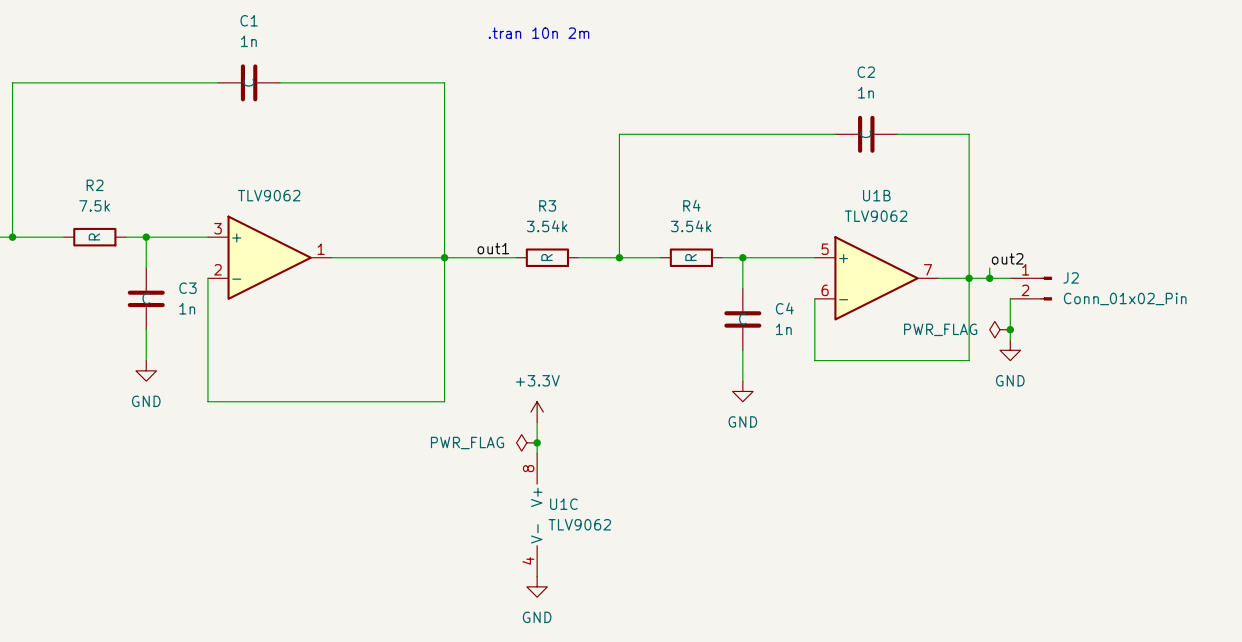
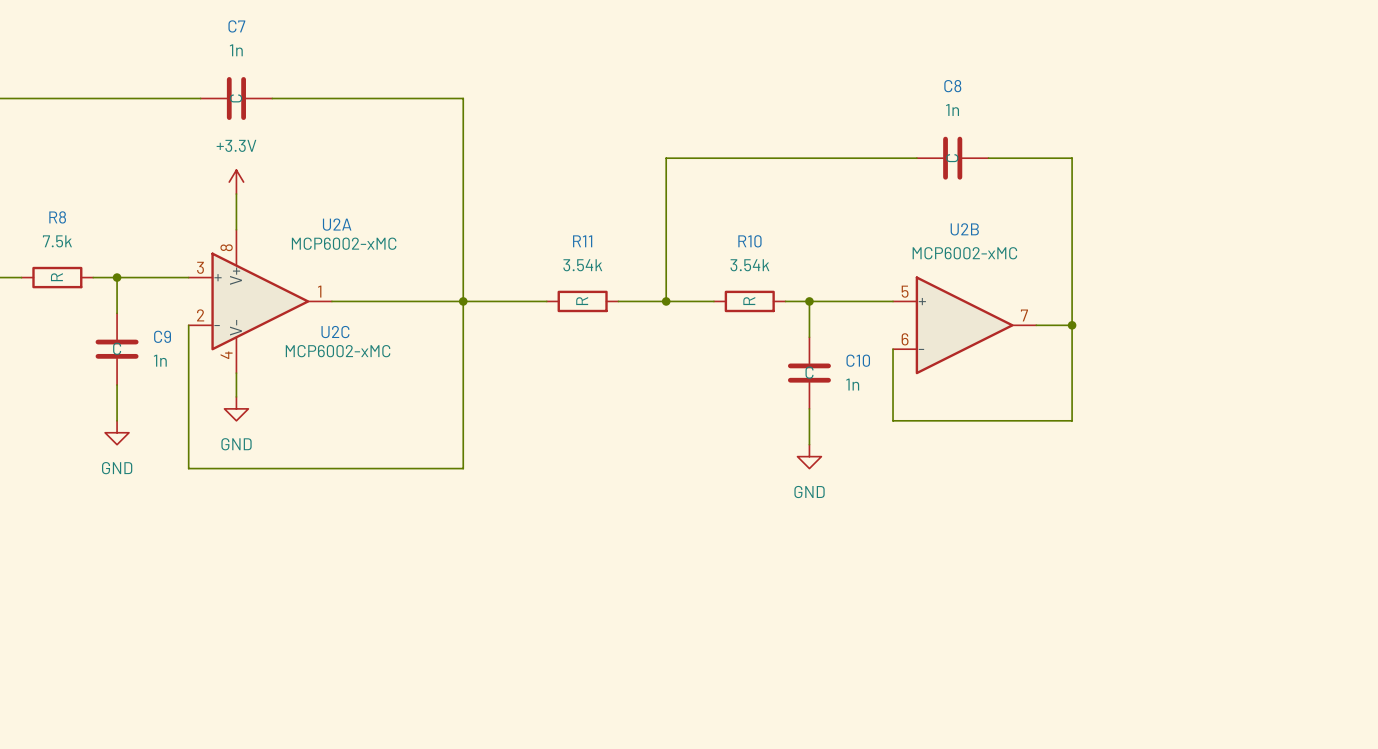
C1 name: C1 (249, 20) -> C7 (236, 26)
text: .tran 10n 2m (538, 33) -> none
C2 name: C2 (866, 72) -> C8 (952, 86)
power symbol: none -> +3.3V (236, 182)
wire: none -> (236, 194) (236, 229)
R2 name: R2 (95, 185) -> R8 (57, 217)
U2A name: none -> U2A (337, 224)
U2A value: TLV9062 (269, 195) -> MCP6002-xMC (344, 243)
U1B name: U1B (876, 195) -> U2B (964, 229)
R3 name: R3 (547, 205) -> R11 (582, 241)
R4 name: R4 (691, 205) -> R10 (749, 241)
U1B value: TLV9062 (876, 216) -> MCP6002-xMC (964, 253)
label: out1 (493, 248) -> none
U2C: none -> MCP6002-xMC (236, 301)
label: out2 (1007, 258) -> none
wire: (989, 268) (989, 278) -> none
wire: (969, 278) (1010, 278) -> none
junction: (989, 278) -> none
C3 name: C3 (187, 288) -> C9 (162, 336)
J2: Conn_01x02_Pin (1031, 288) -> none
wire: (1010, 298) (1010, 340) -> none
C4 name: C4 (784, 308) -> C10 (858, 360)
wire: none -> (236, 373) (236, 396)
power symbol: PWR_FLAG (999, 329) -> none
junction: (1010, 329) -> none
power symbol: none -> GND (236, 408)
power symbol: GND (1010, 350) -> none
power symbol: +3.3V (537, 412) -> none
wire: (537, 422) (537, 453) -> none
power symbol: PWR_FLAG (526, 442) -> none
junction: (537, 442) -> none
U1C: TLV9062 (537, 514) -> none
power symbol: GND (537, 586) -> none

